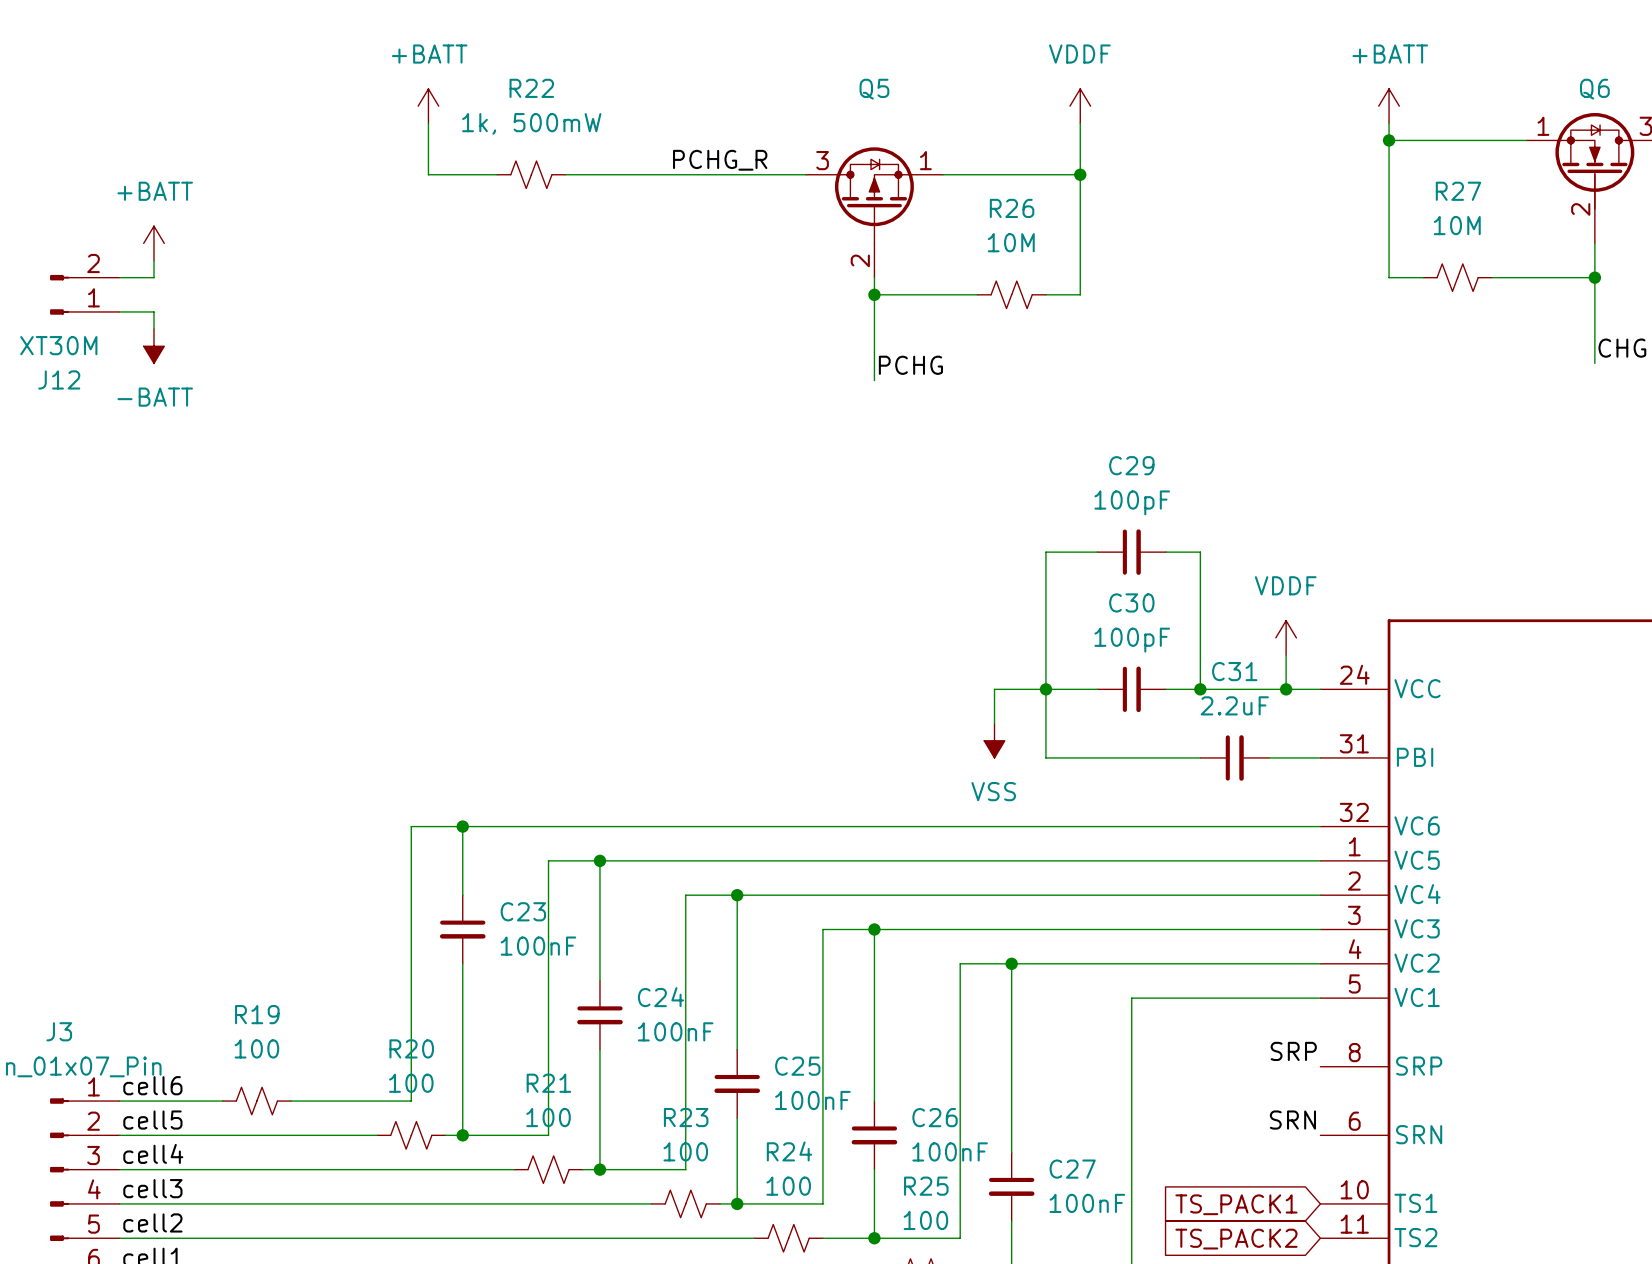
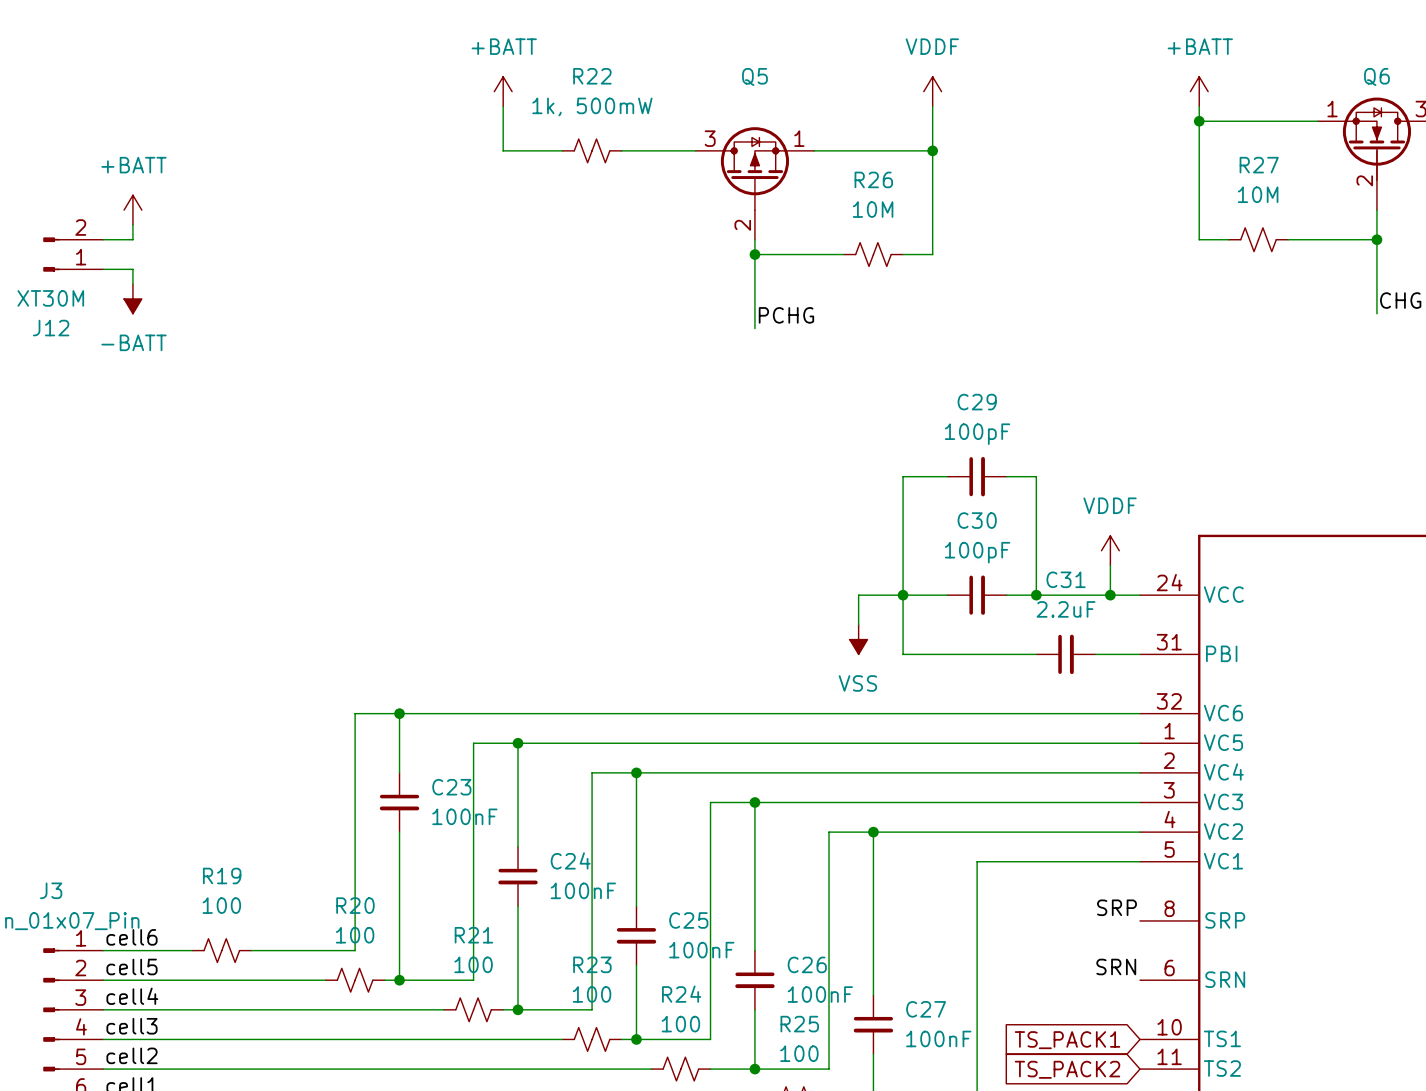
power symbol position: +BATT (428, 106) -> +BATT (503, 91)
wire: (428, 123) (428, 174) (497, 174) -> none
label: PCHG_R (720, 160) -> none
R22 position: (531, 174) -> (592, 150)
wire: (565, 174) (582, 174) -> (503, 106) (503, 150)
wire: (651, 174) (720, 174) -> none

